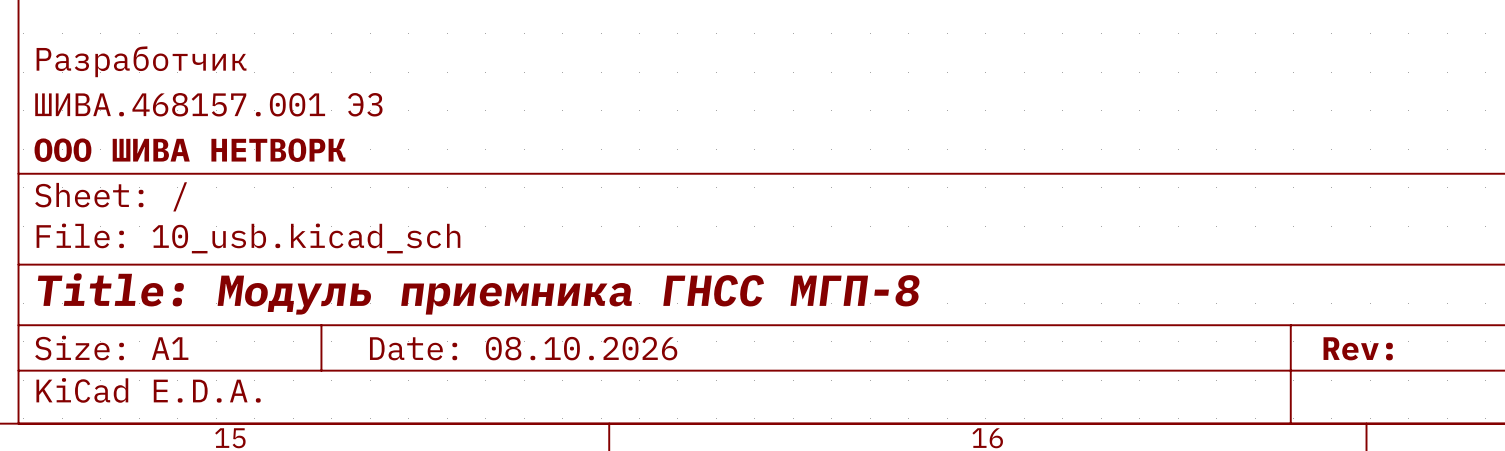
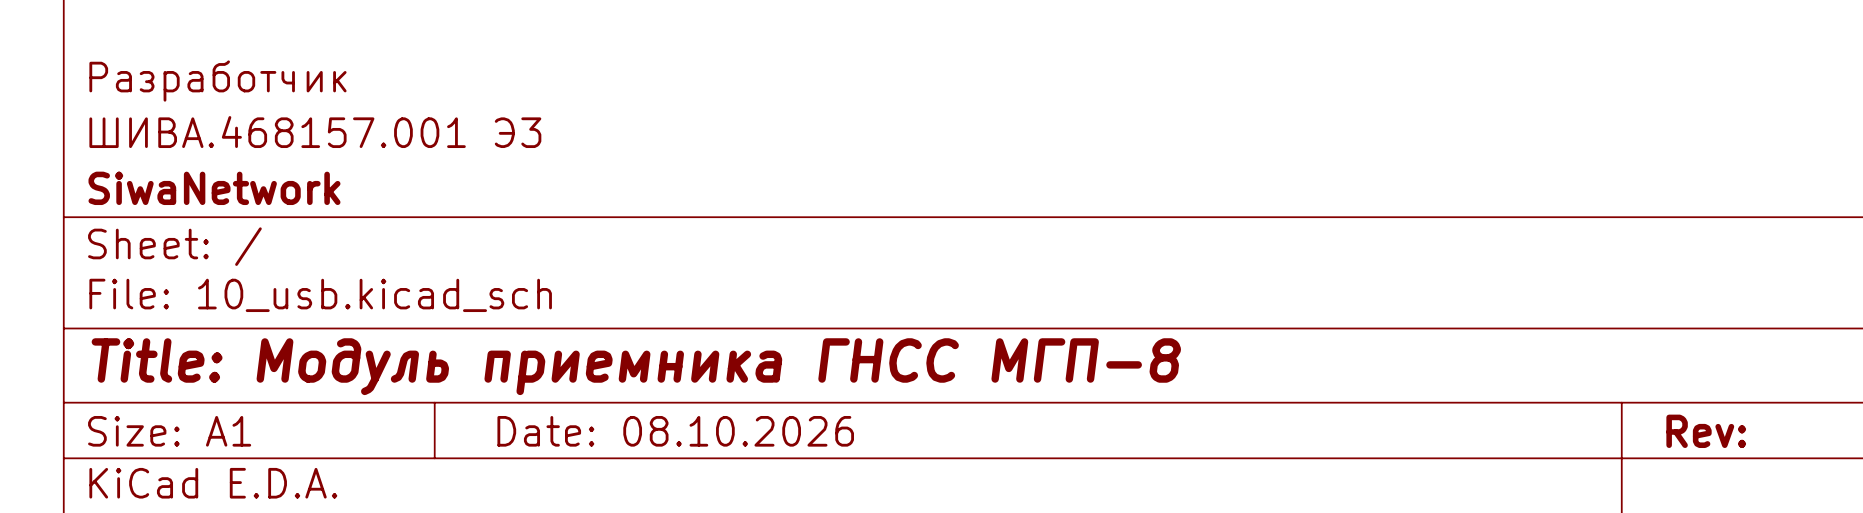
title block: ООО ШИВА НЕТВОРК (189, 150) -> SiwaNetwork (214, 188)

